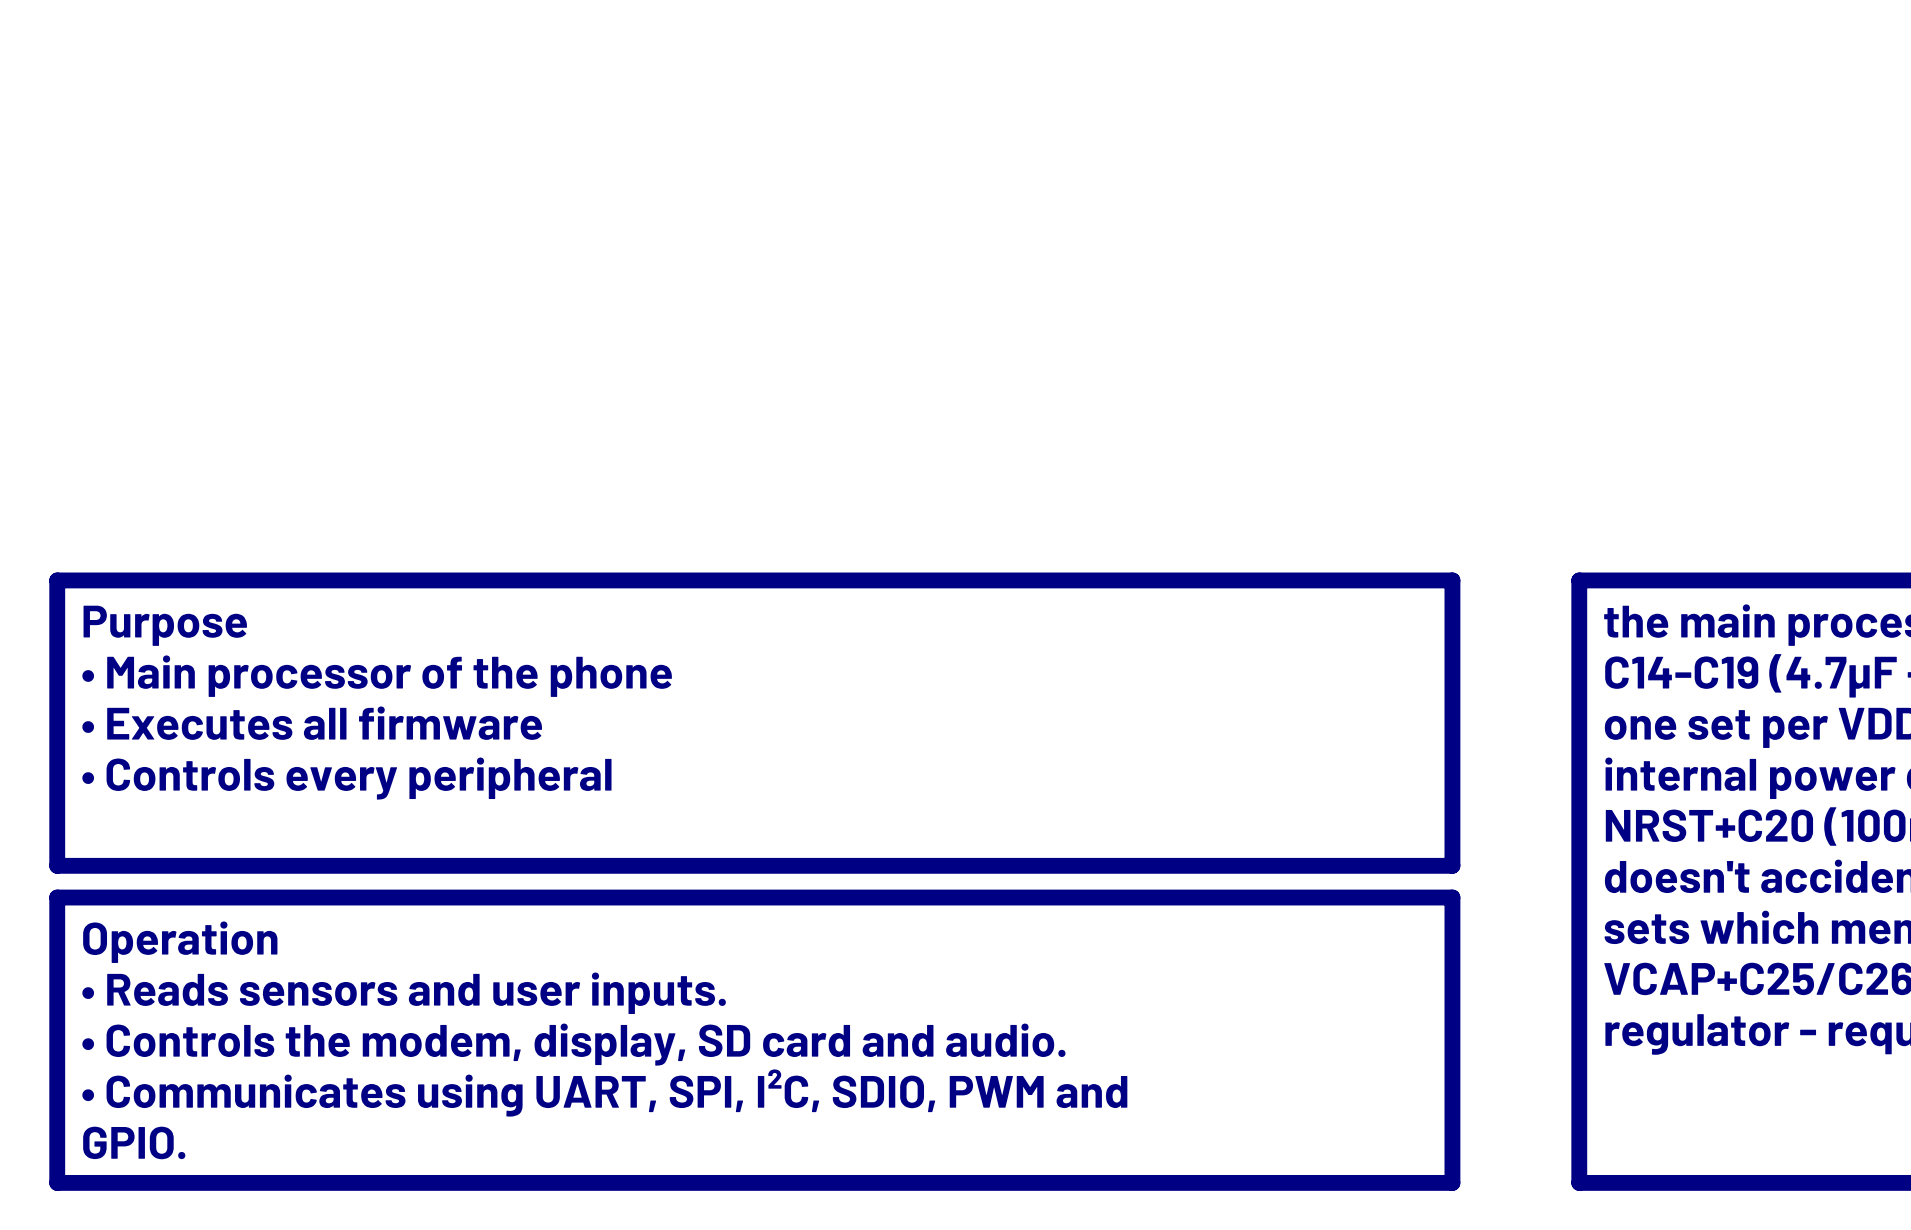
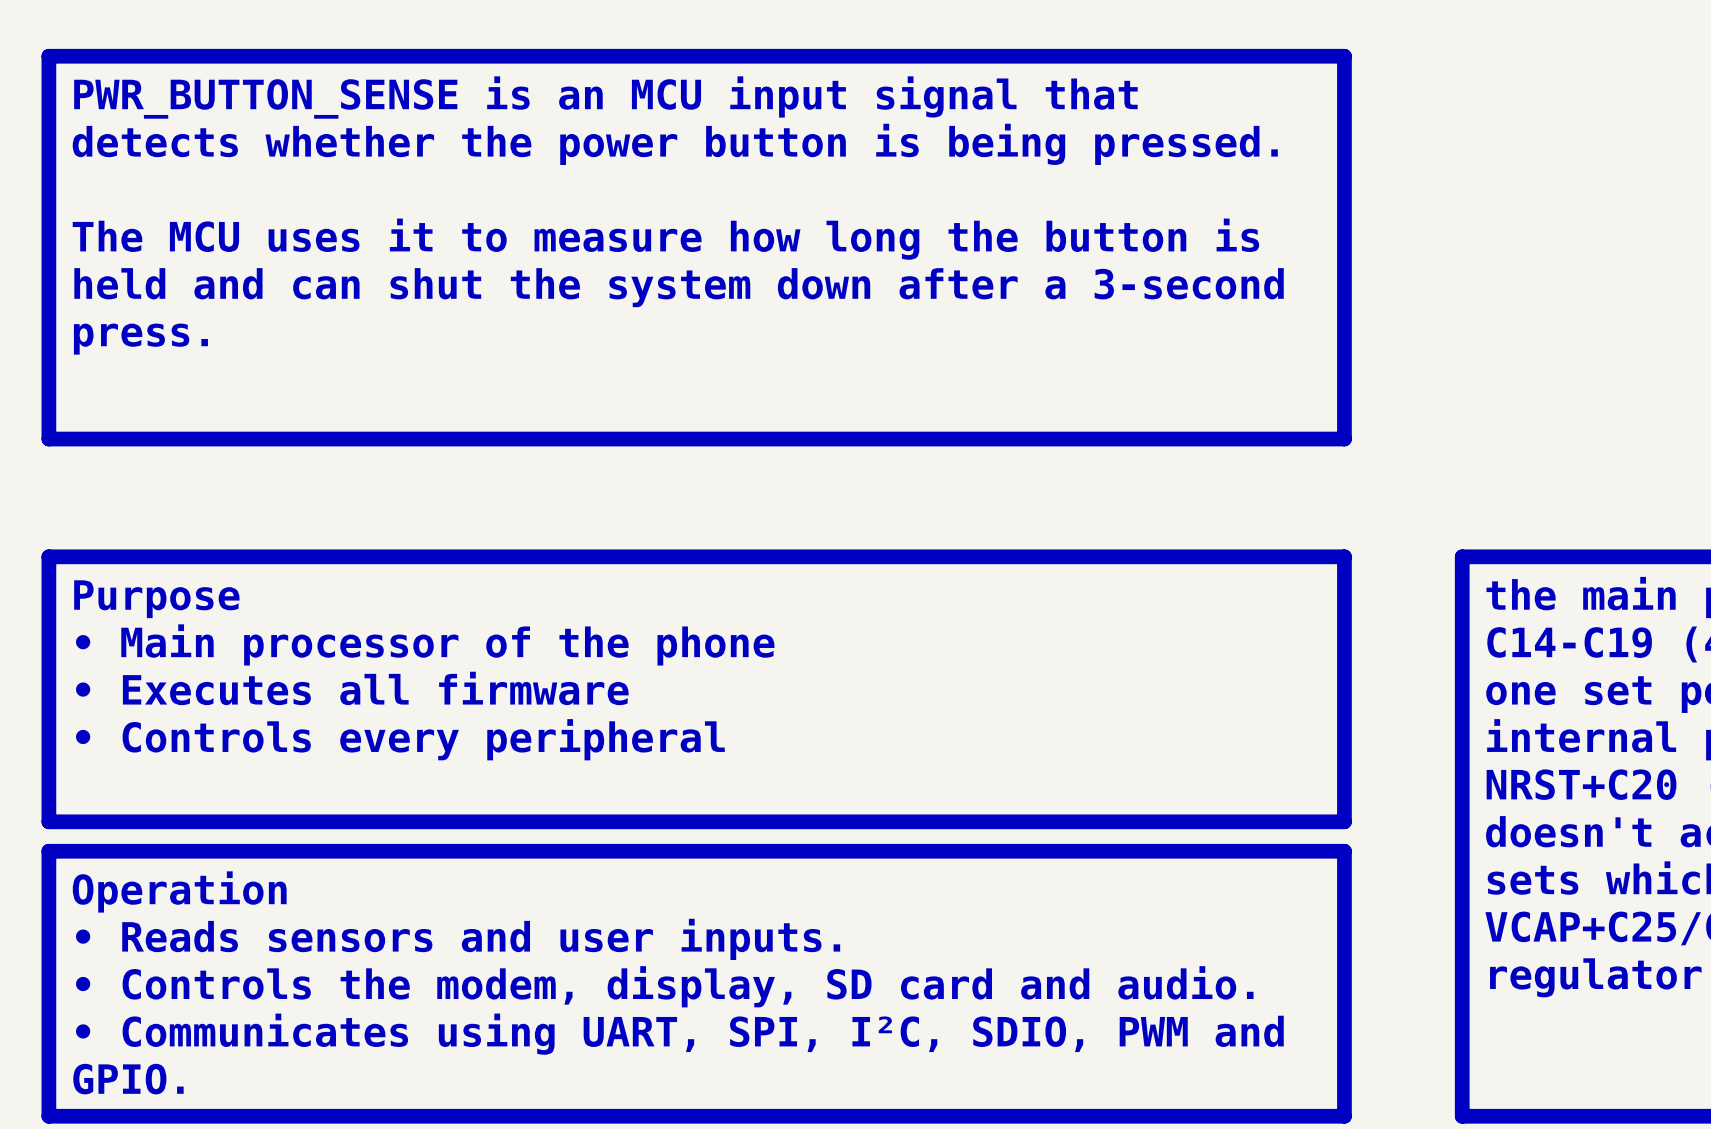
line: none -> (48, 56) (1344, 56) (1344, 439) (48, 439) (48, 56)
text: none -> PWR_BUTTON_SENSE is an MCU input signal that (605, 97)
text: none -> detects whether the power button is being pressed. (675, 144)
text: none -> The MCU uses it to measure how long the button is (665, 239)
text: none -> held and can shut the system down after a 3-second (679, 287)
text: none -> press. (140, 339)

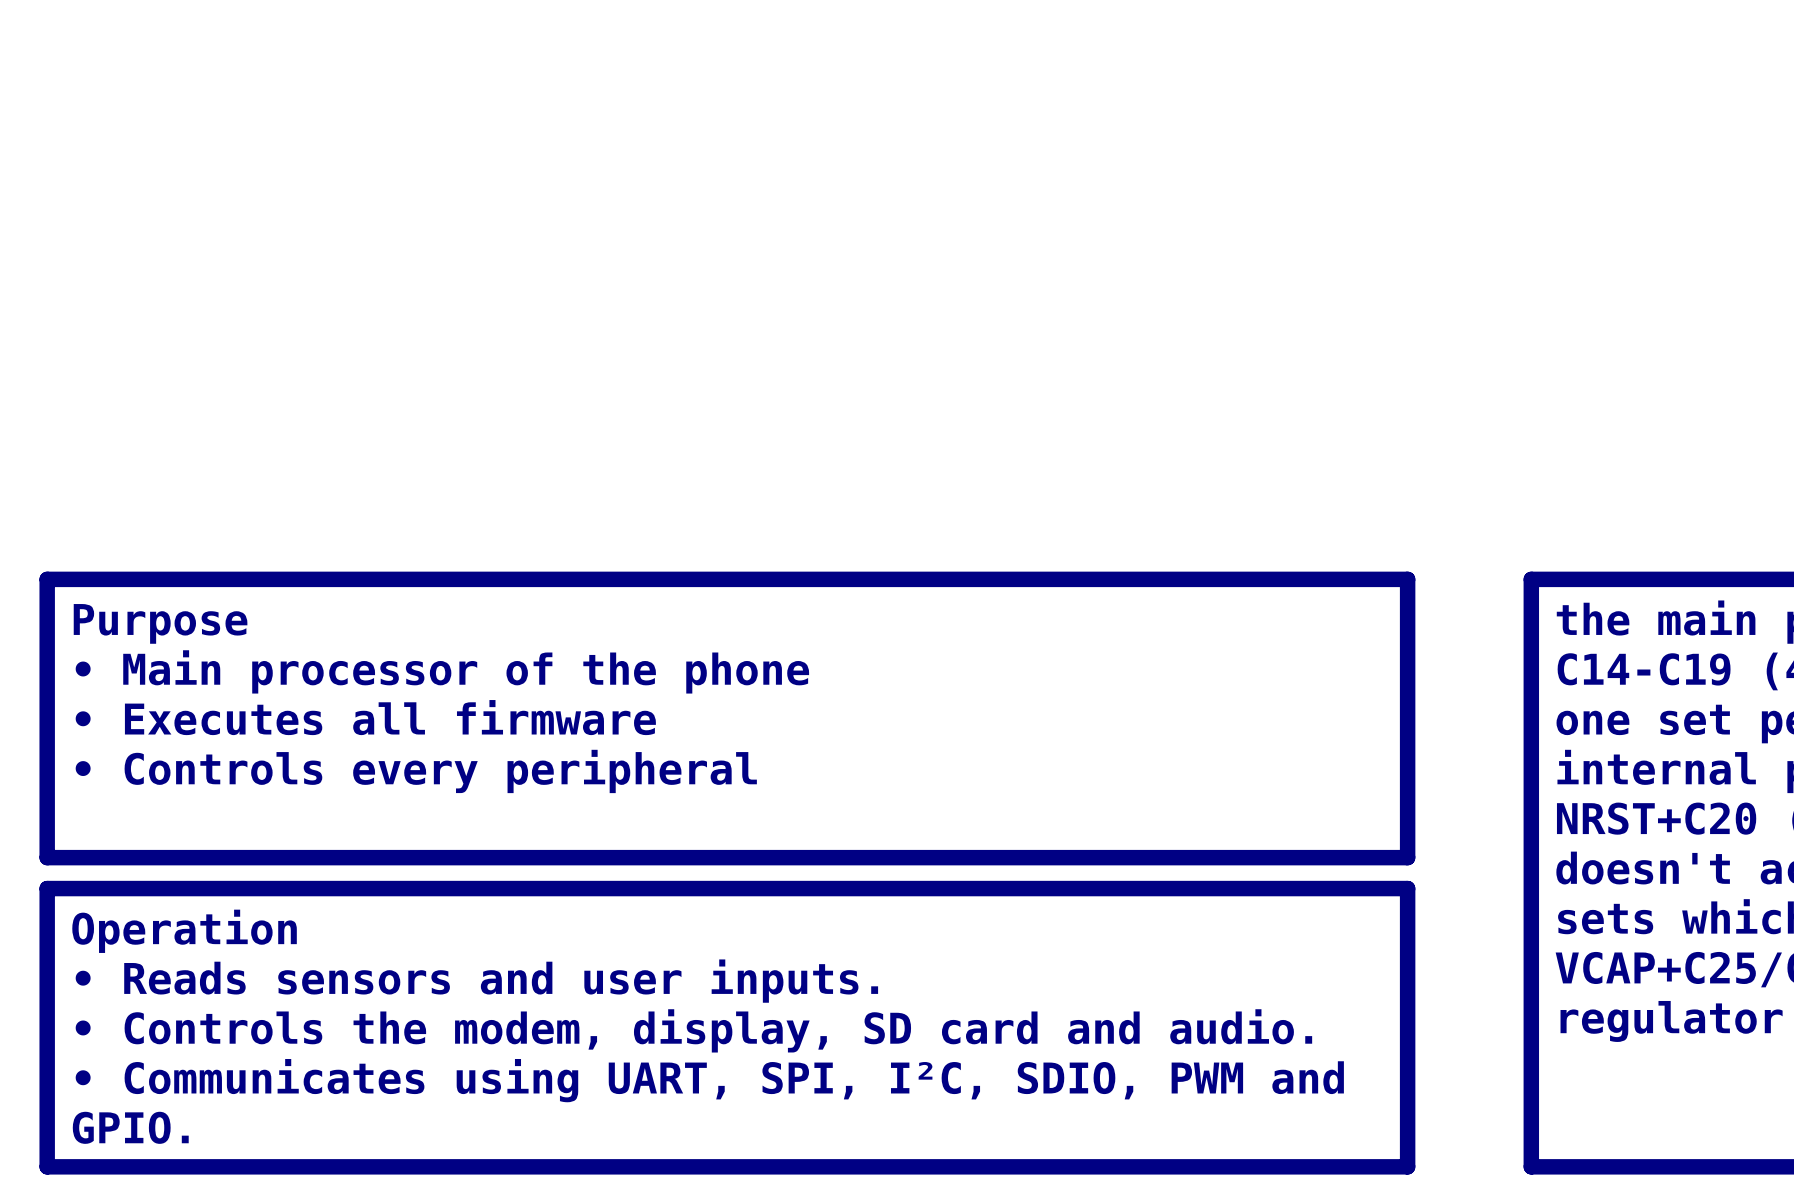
line: (48, 56) (1344, 56) (1344, 439) (48, 439) (48, 56) -> none
text: PWR_BUTTON_SENSE is an MCU input signal that (605, 97) -> none
text: detects whether the power button is being pressed. (675, 144) -> none
text: The MCU uses it to measure how long the button is (665, 239) -> none
text: held and can shut the system down after a 3-second (679, 287) -> none
text: press. (140, 339) -> none

